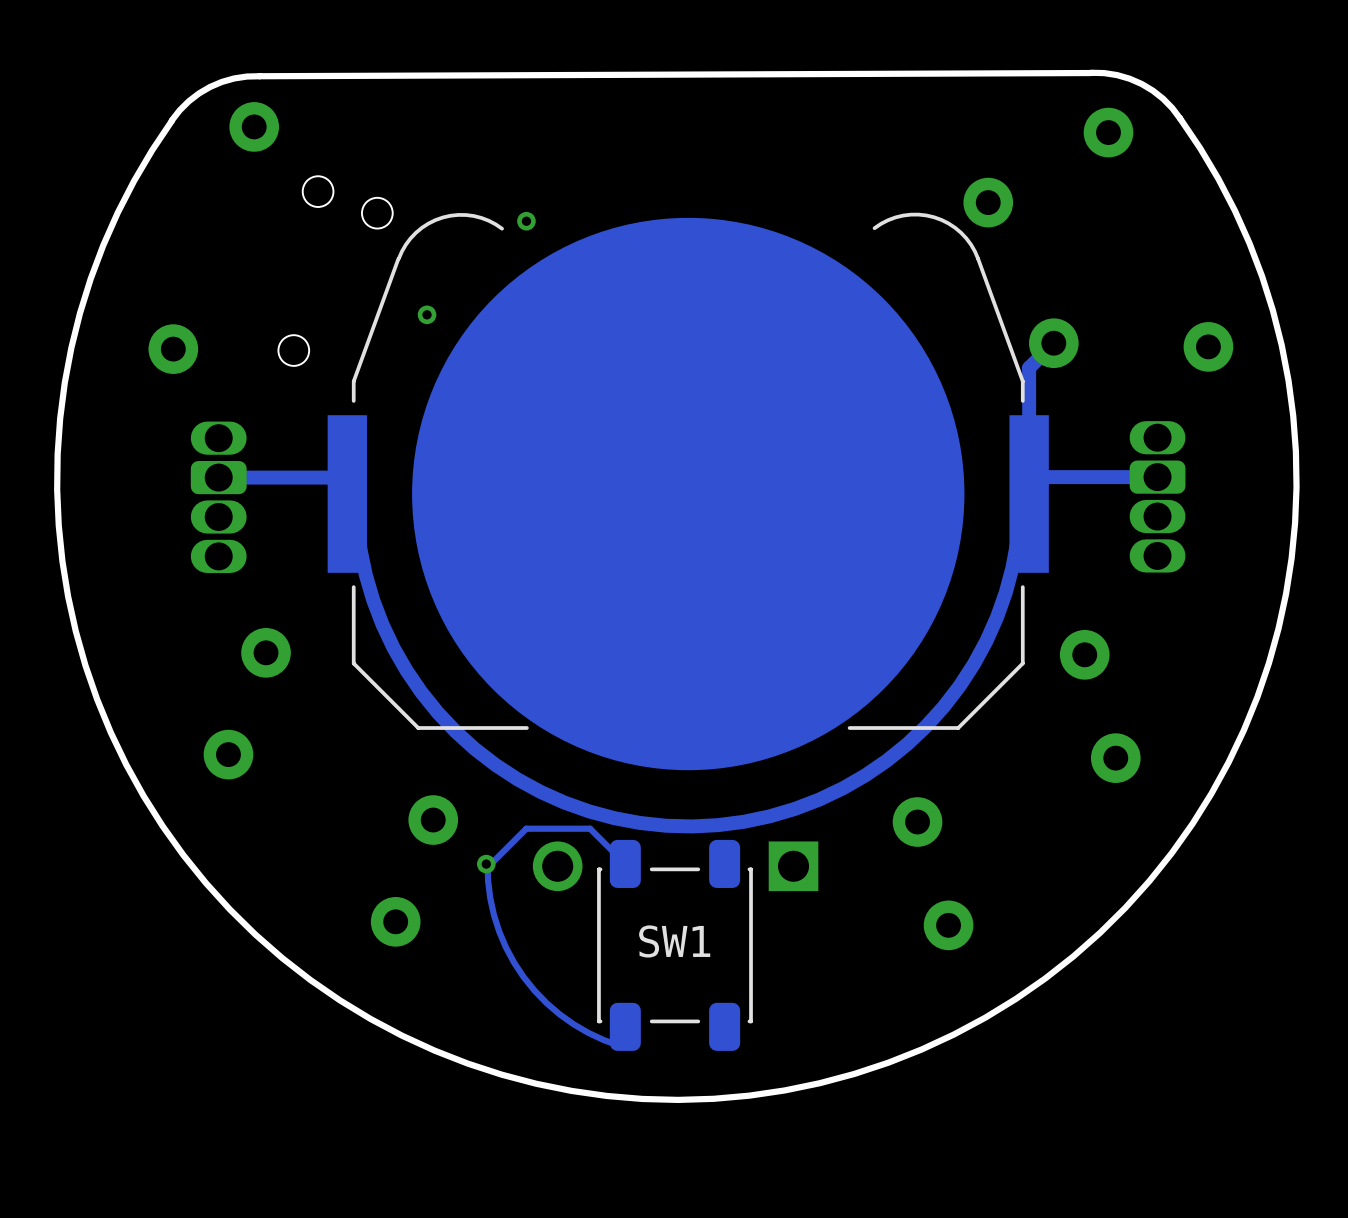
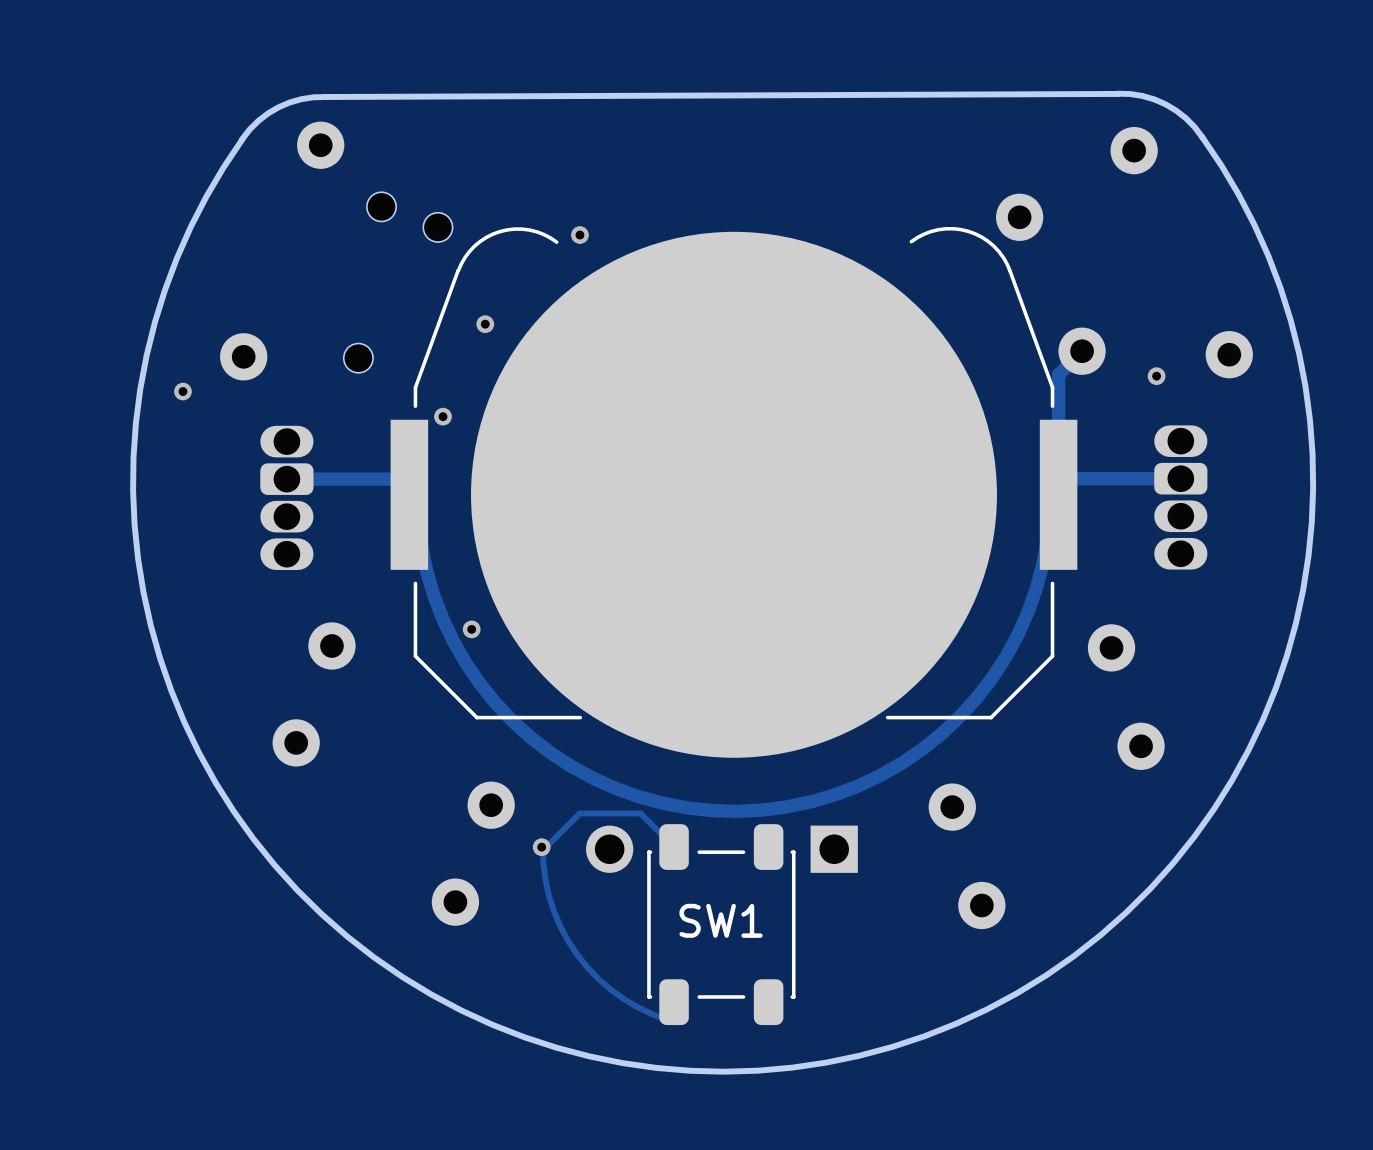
via: none -> (1156, 376)
via: none -> (182, 391)
via: none -> (443, 416)
via: none -> (471, 629)

